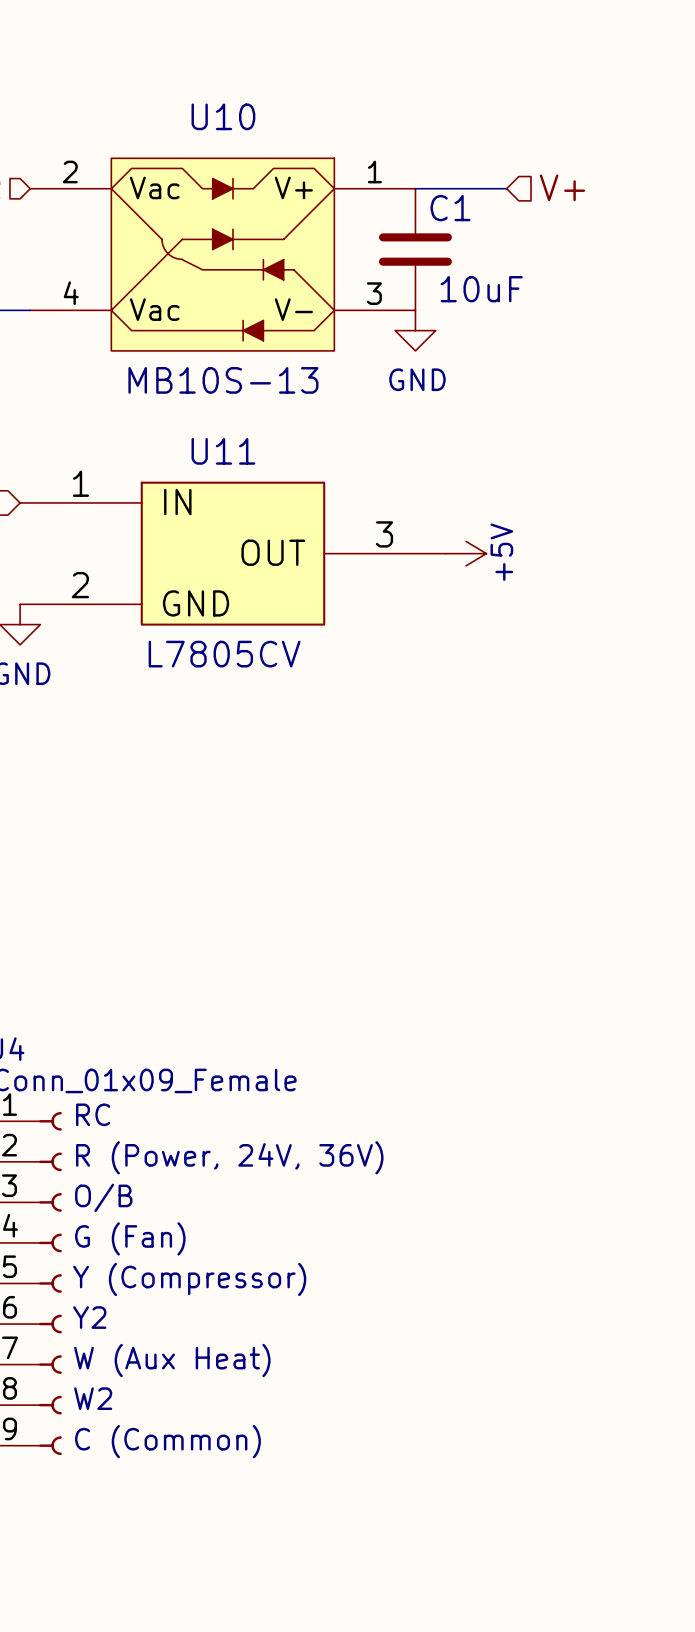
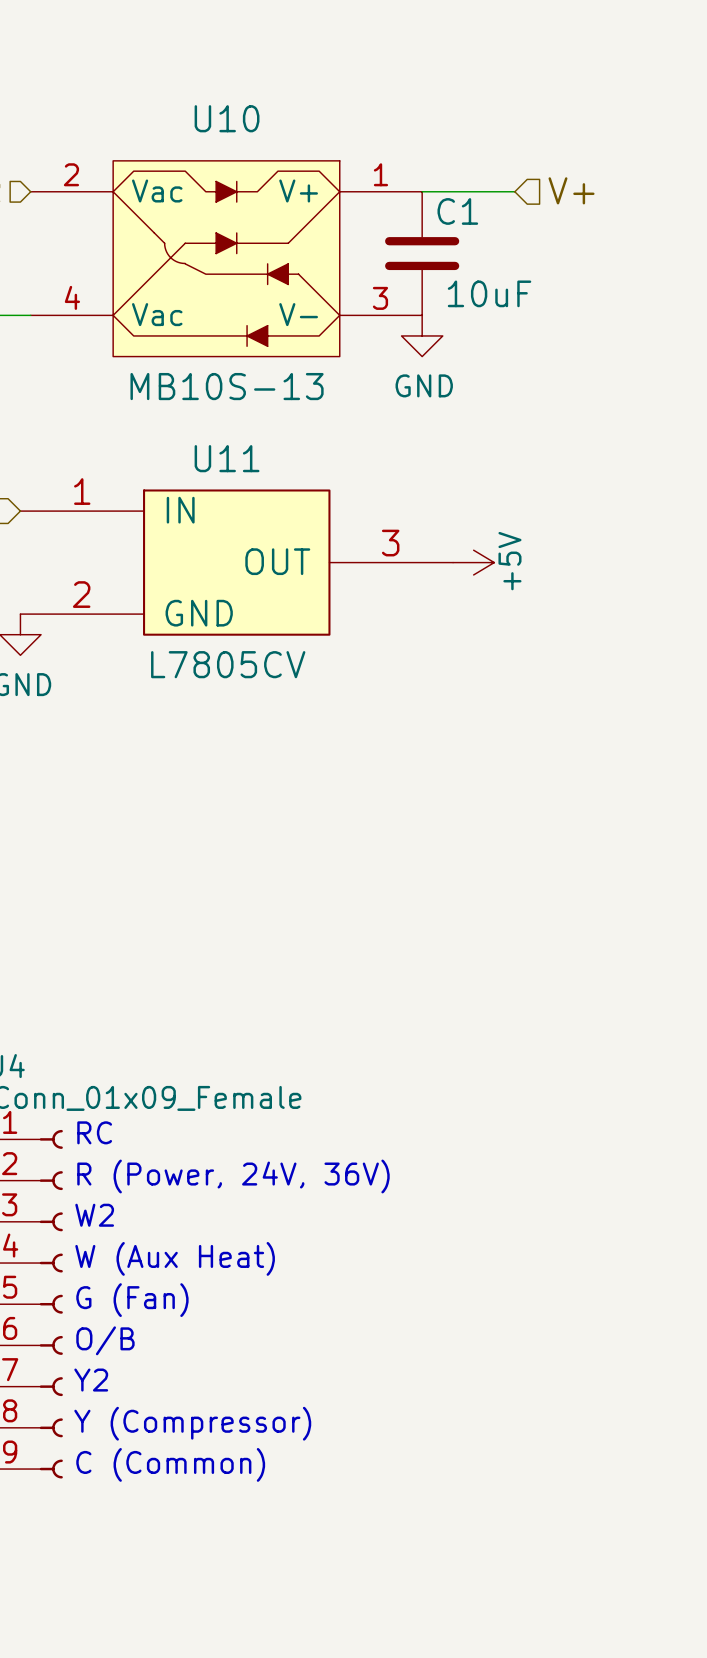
text: O/B (103, 1197) -> W2 (94, 1215)
text: G (Fan) (130, 1238) -> W (Aux Heat) (175, 1258)
text: Y (Compressor) (189, 1279) -> G (Fan) (132, 1300)
text: Y2 (89, 1317) -> O/B (105, 1340)
text: W (Aux Heat) (172, 1360) -> Y2 (91, 1380)
text: W2 (93, 1398) -> Y (Compressor) (192, 1423)

